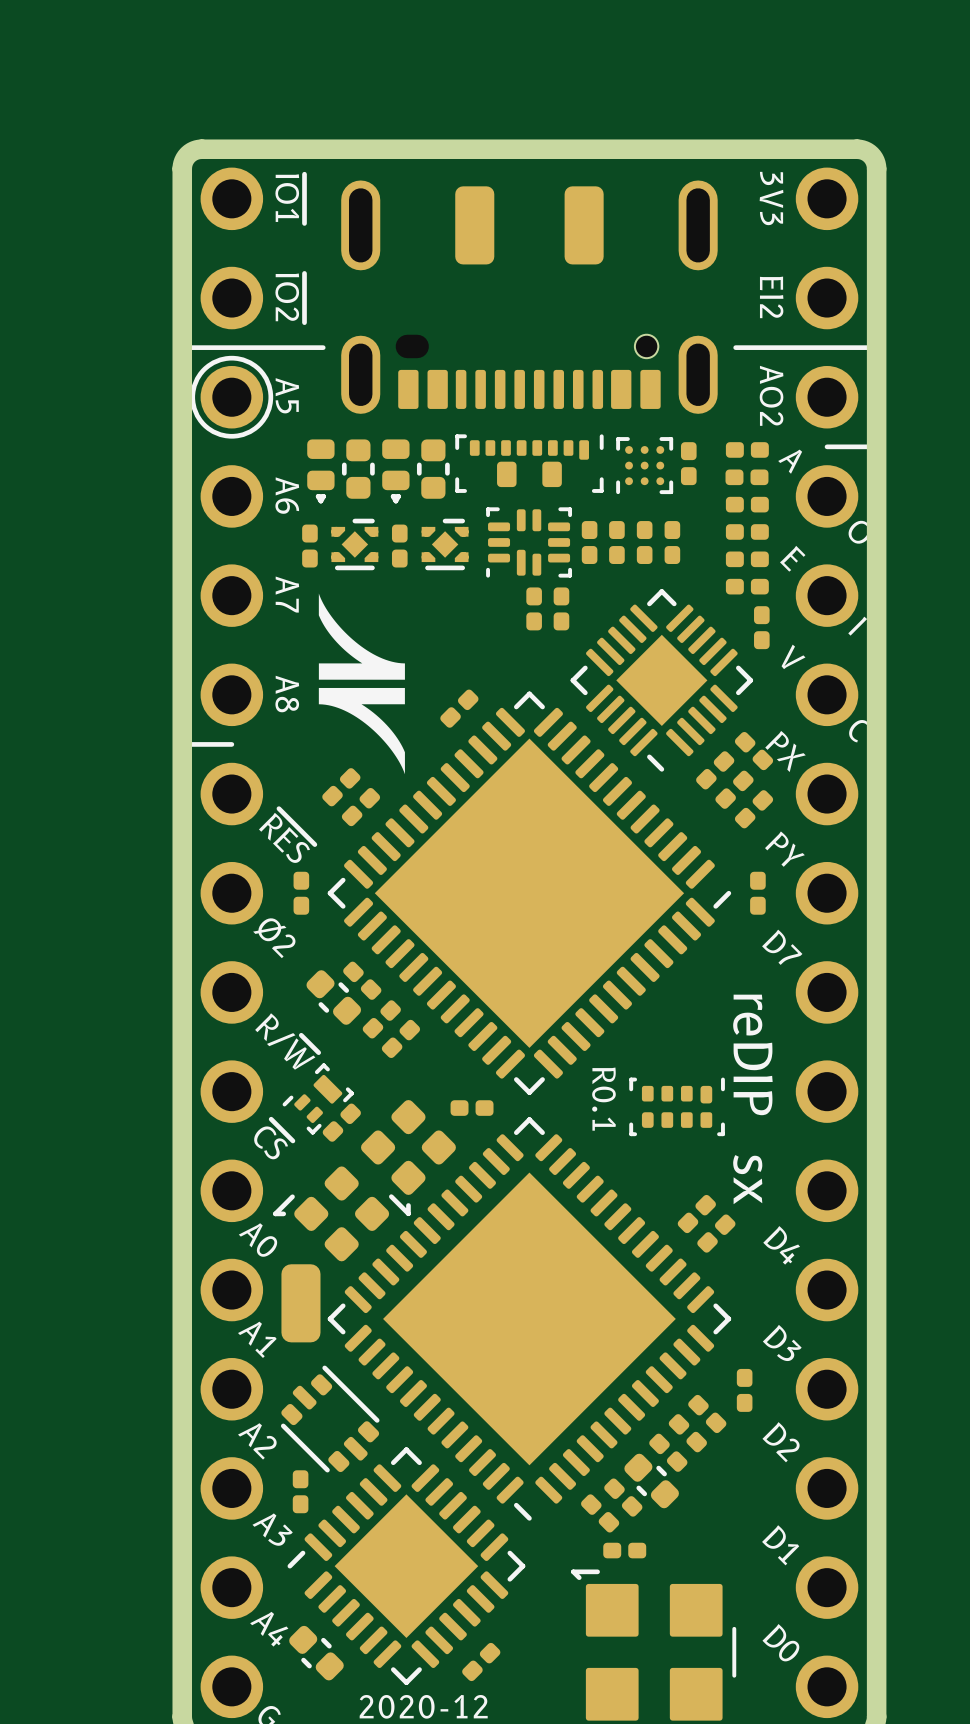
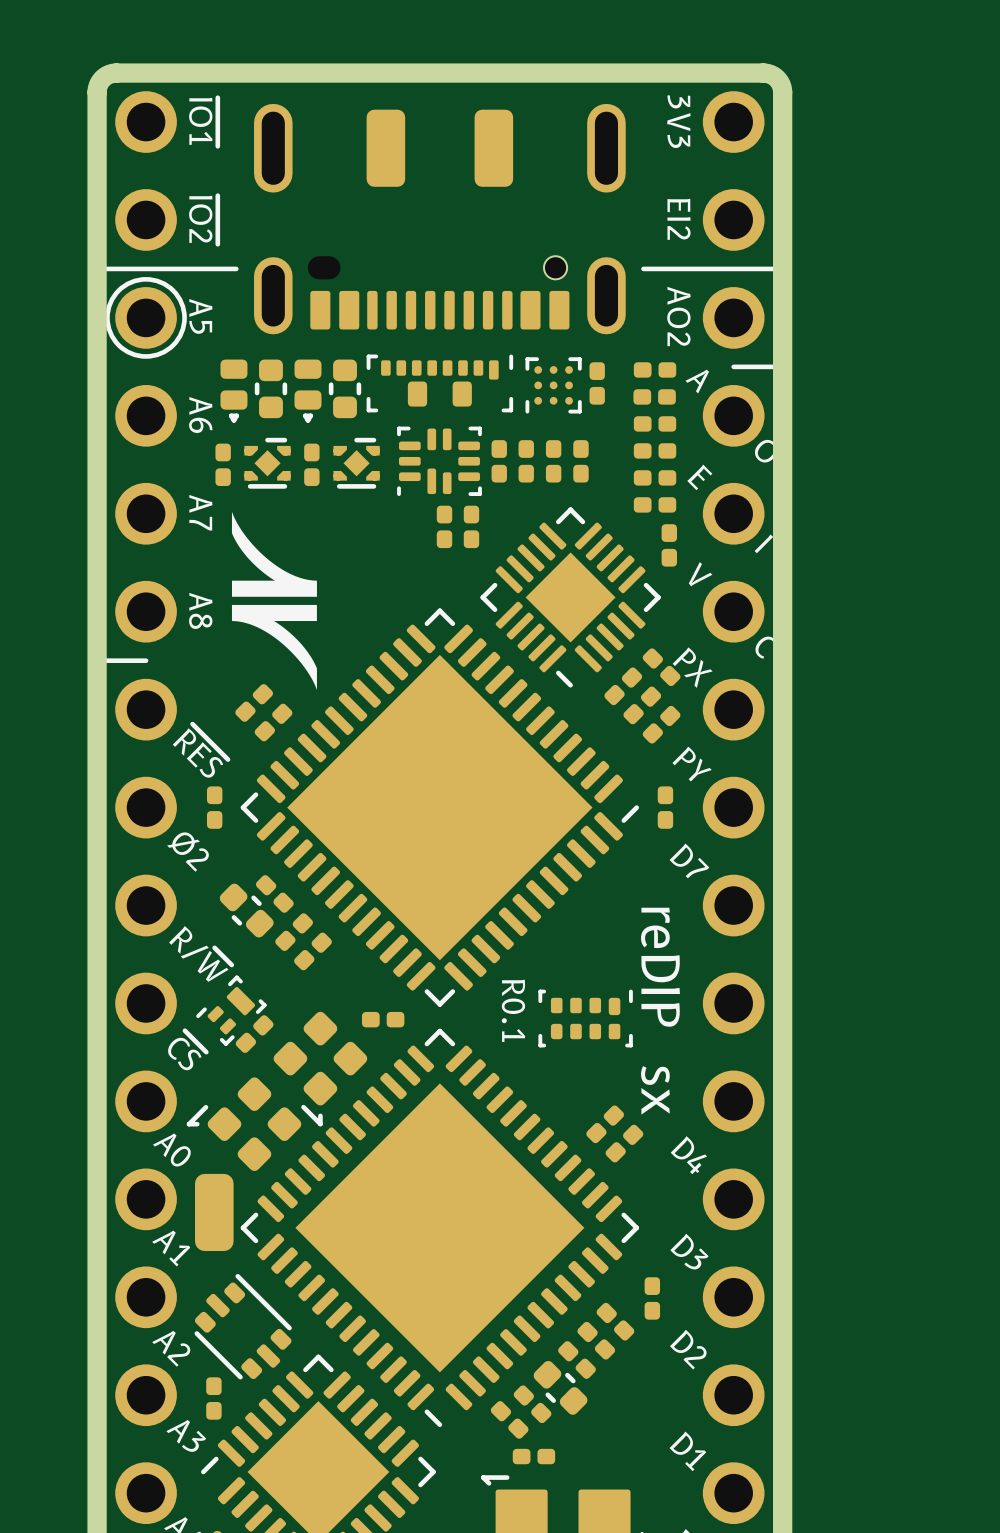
part: (459, 708) -> none

